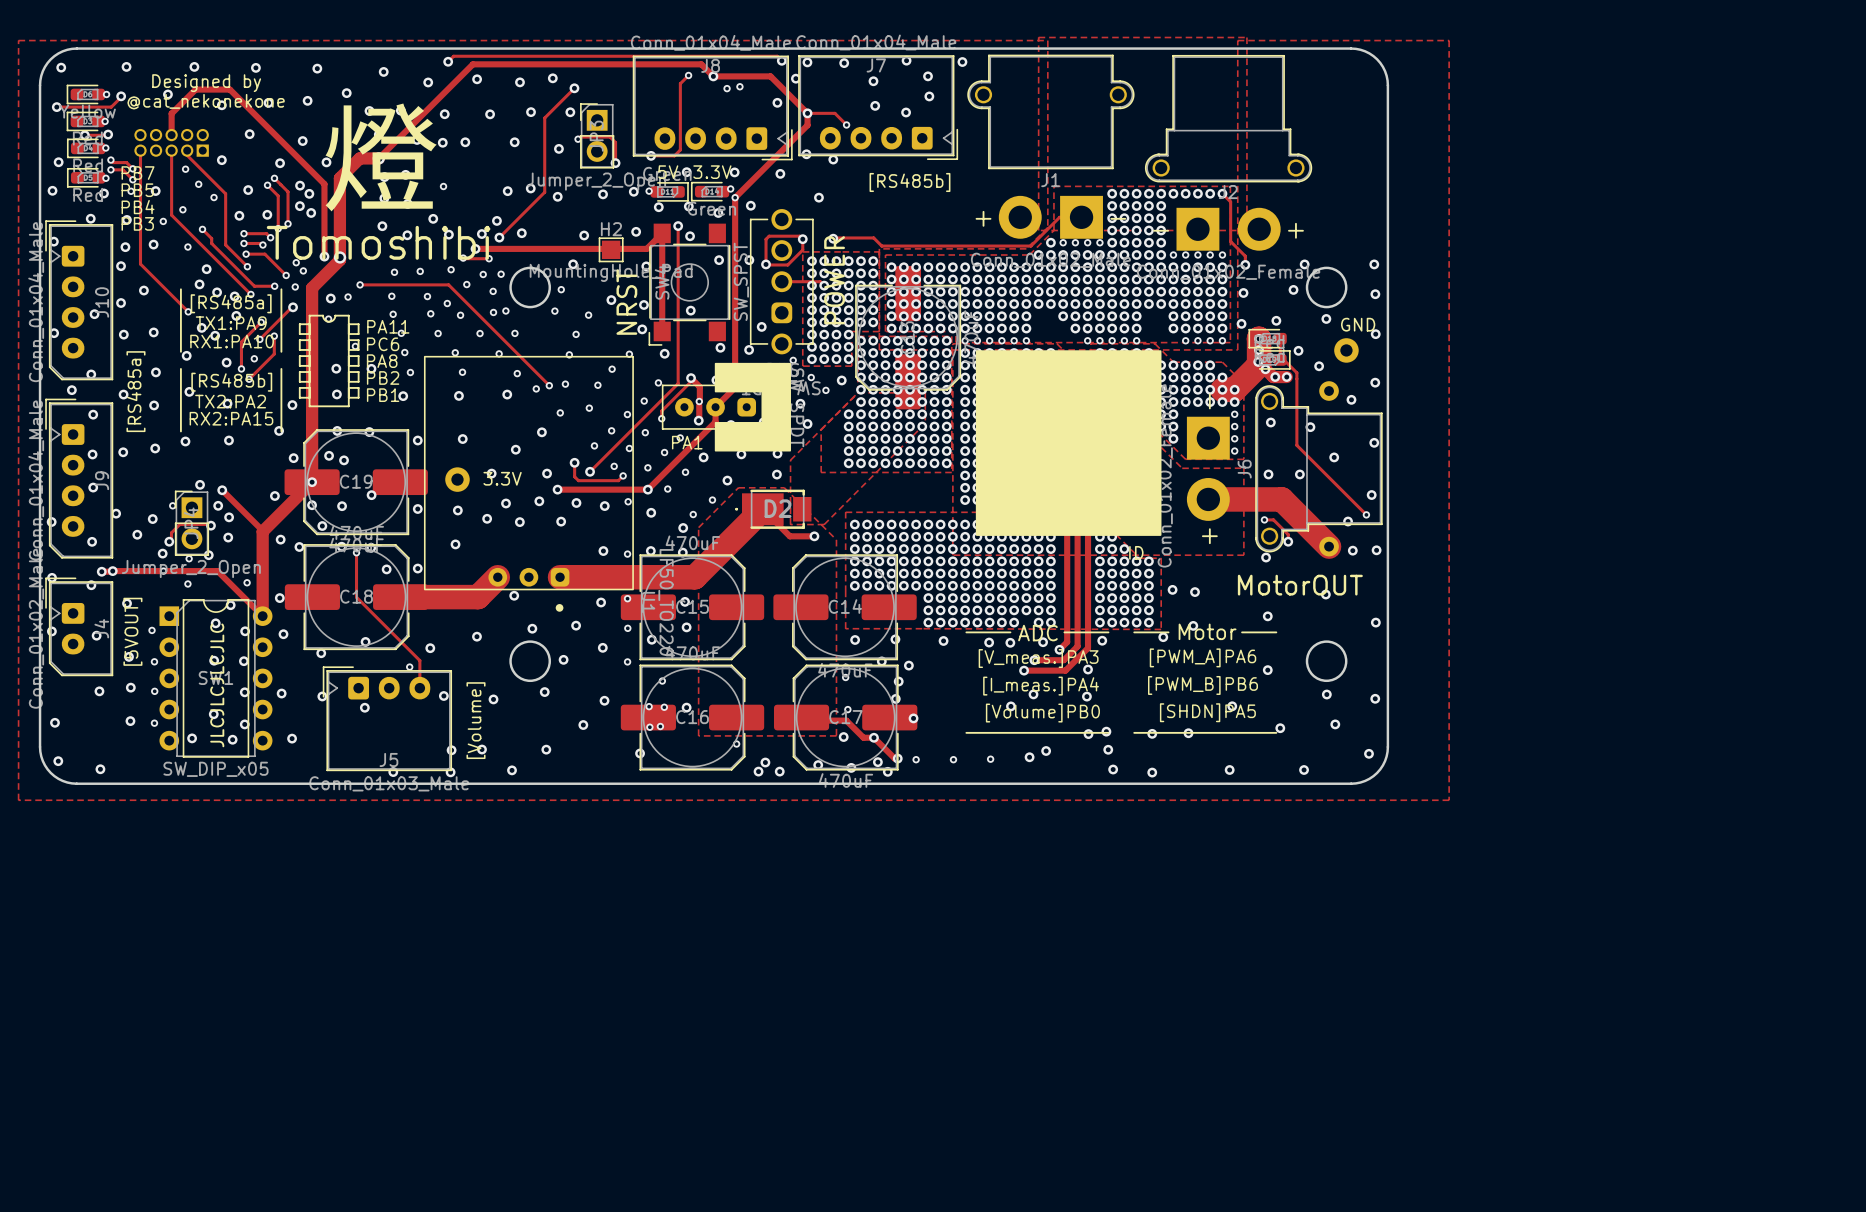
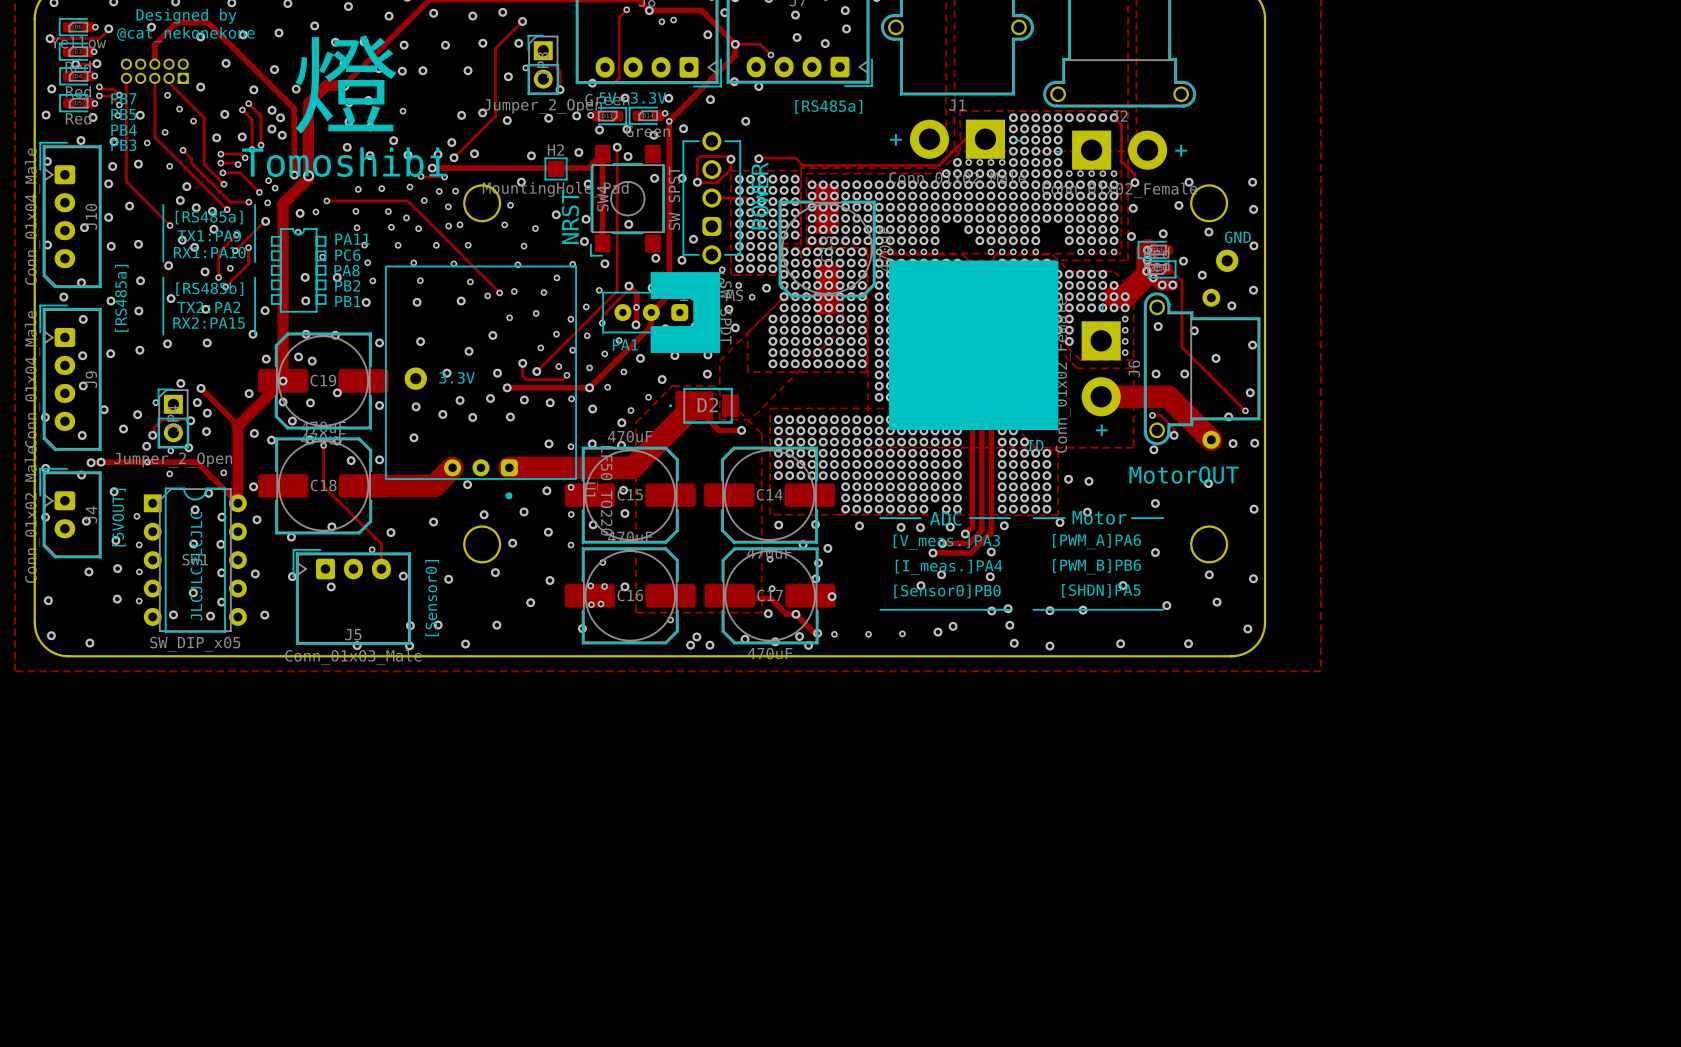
text: [RS485b] (909, 182) -> [RS485a] (828, 106)
text: [Volume]PB0 (1042, 713) -> [Sensor0]PB0 (947, 591)
text: [Volume] (476, 720) -> [Sensor0] (432, 598)

